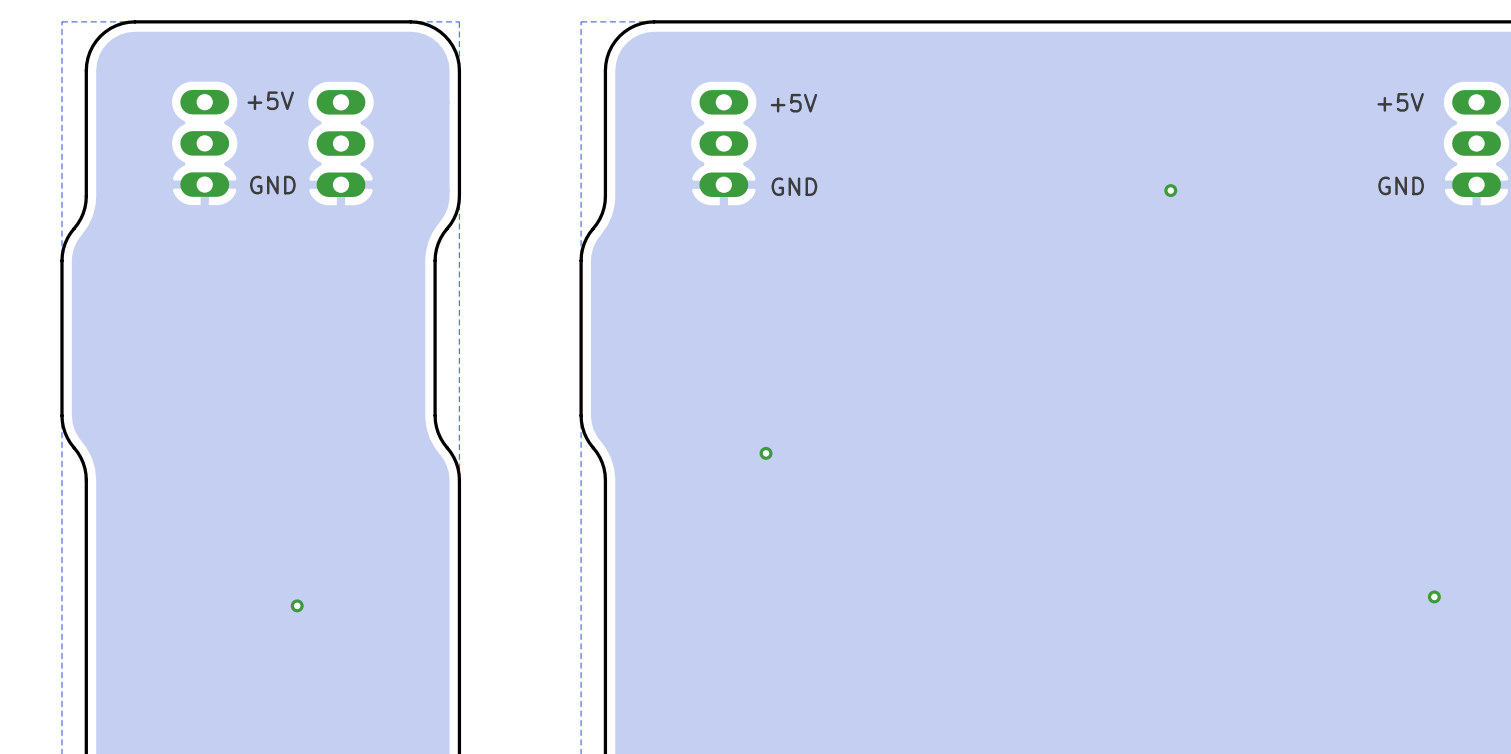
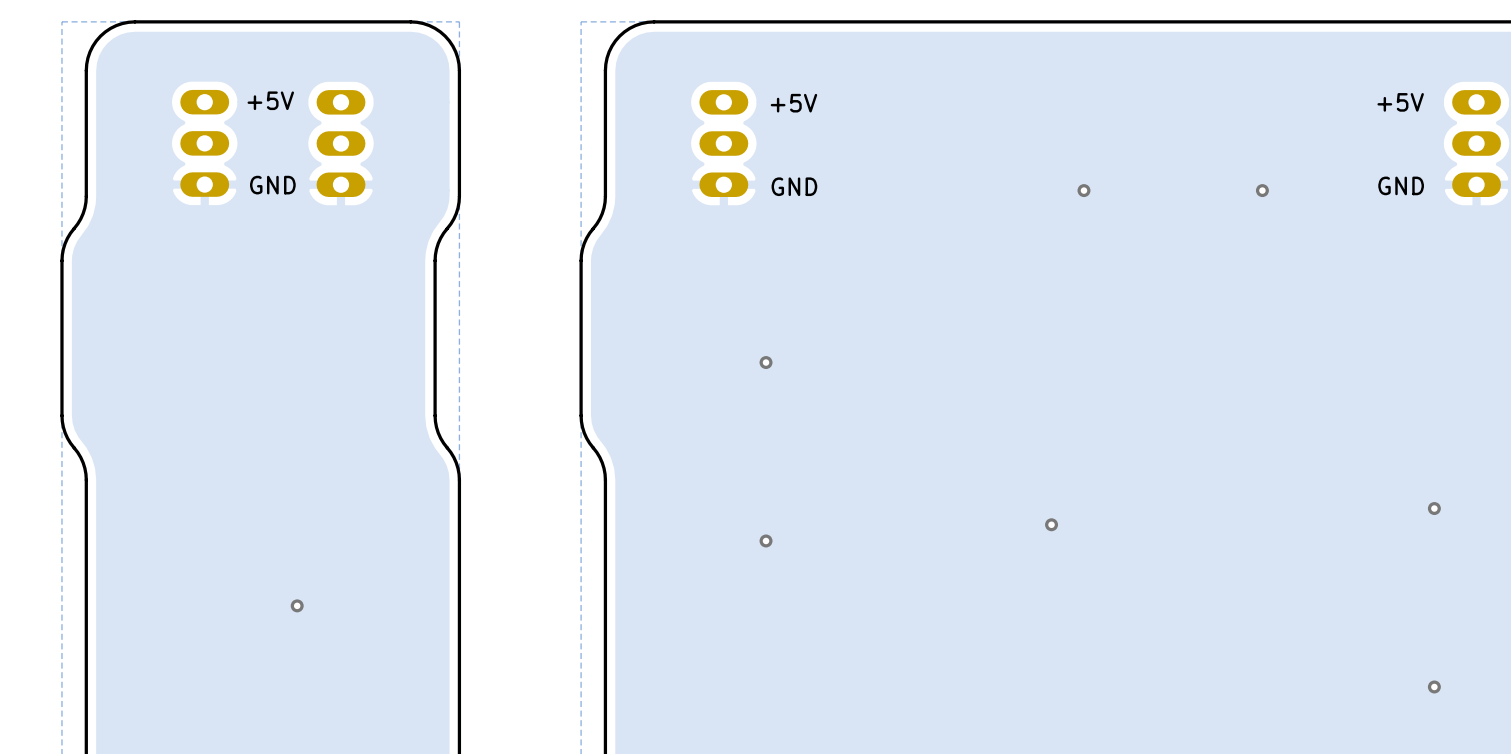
via: none -> (1083, 190)
via: (1170, 190) -> none
via: none -> (1262, 190)
via: none -> (766, 362)
via: (766, 453) -> none
via: none -> (1434, 508)
via: none -> (1051, 524)
via: none -> (766, 540)
via: (1434, 596) -> none
via: none -> (1434, 686)

